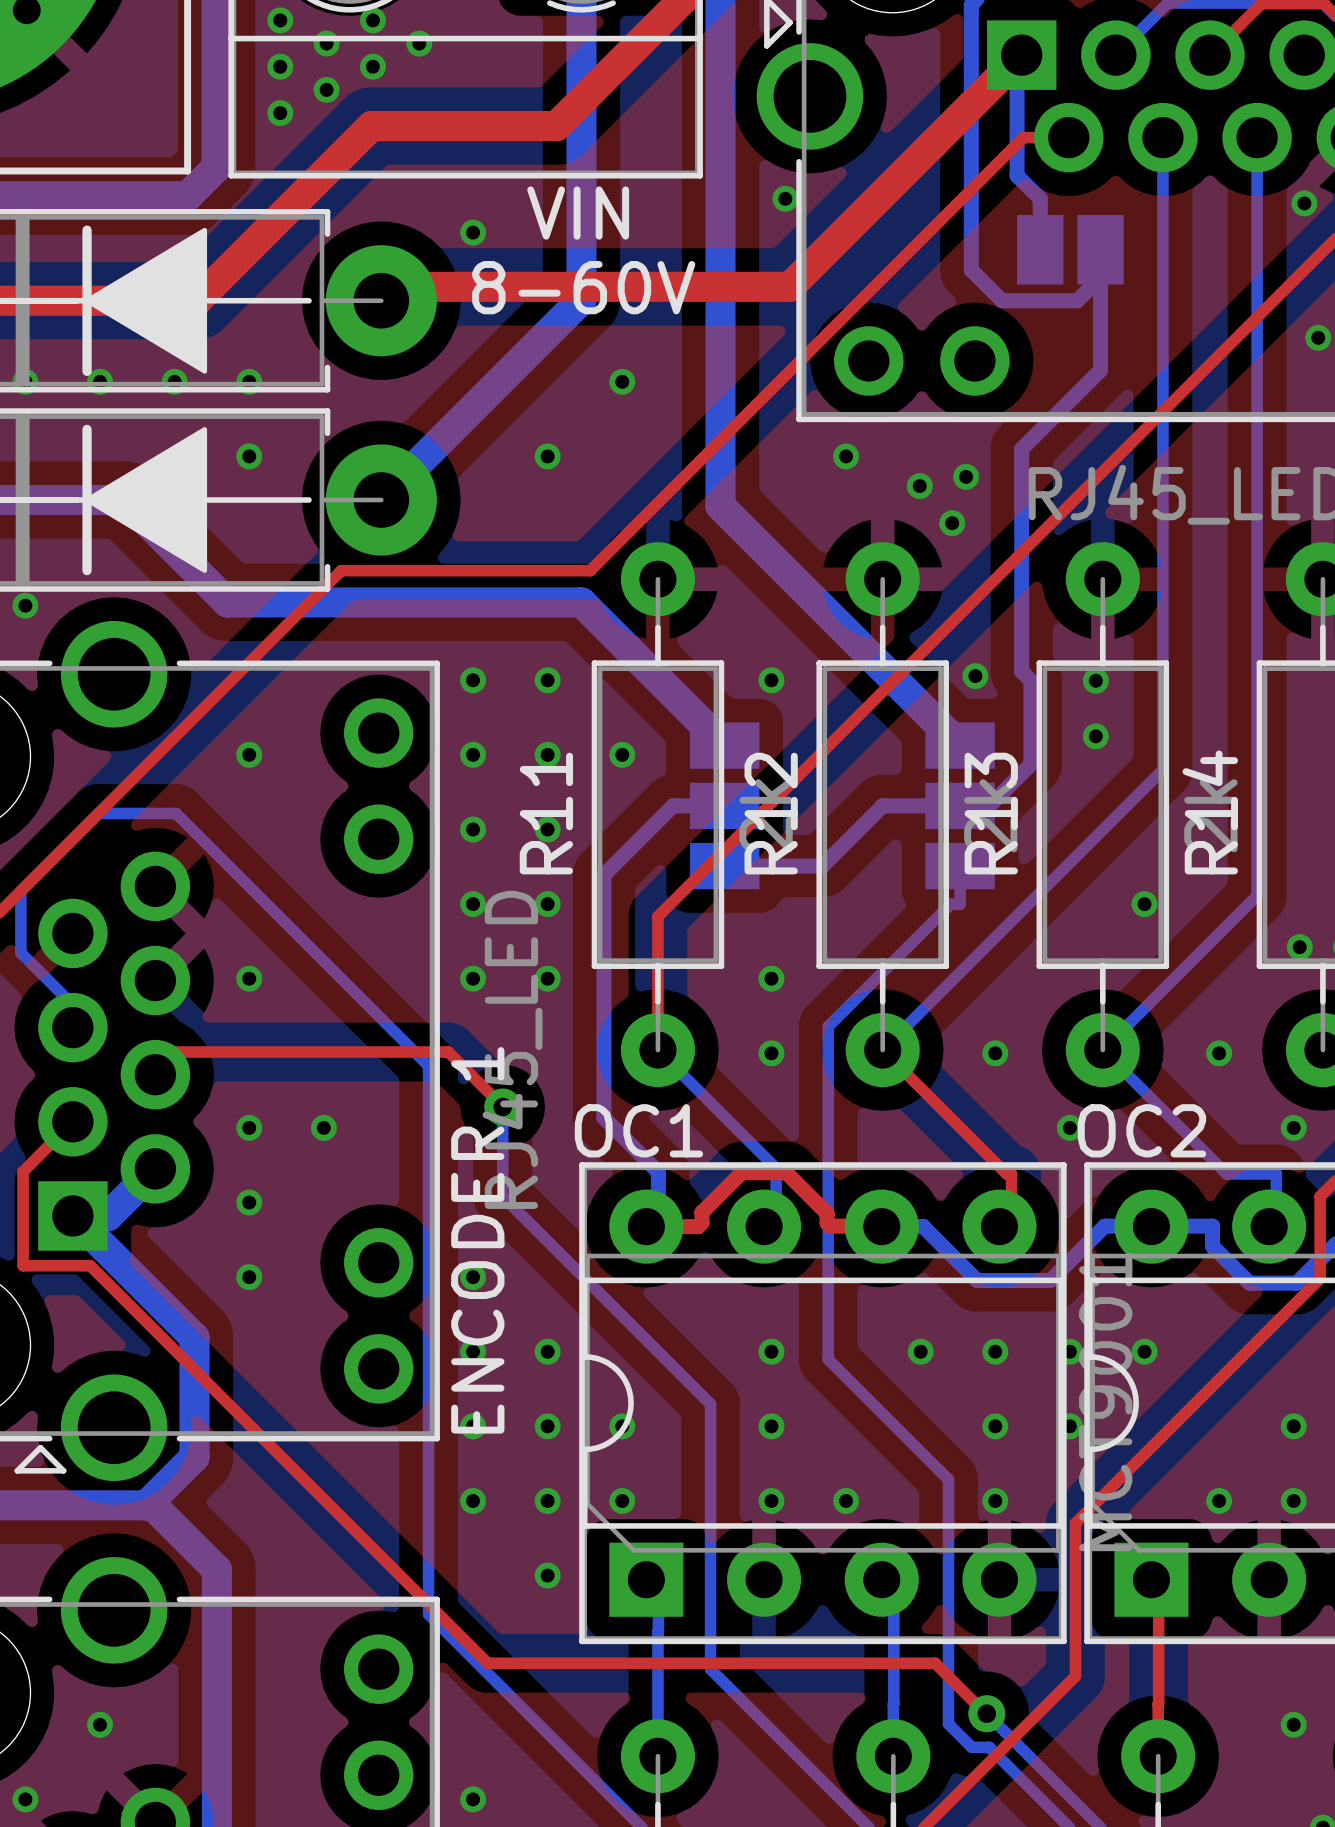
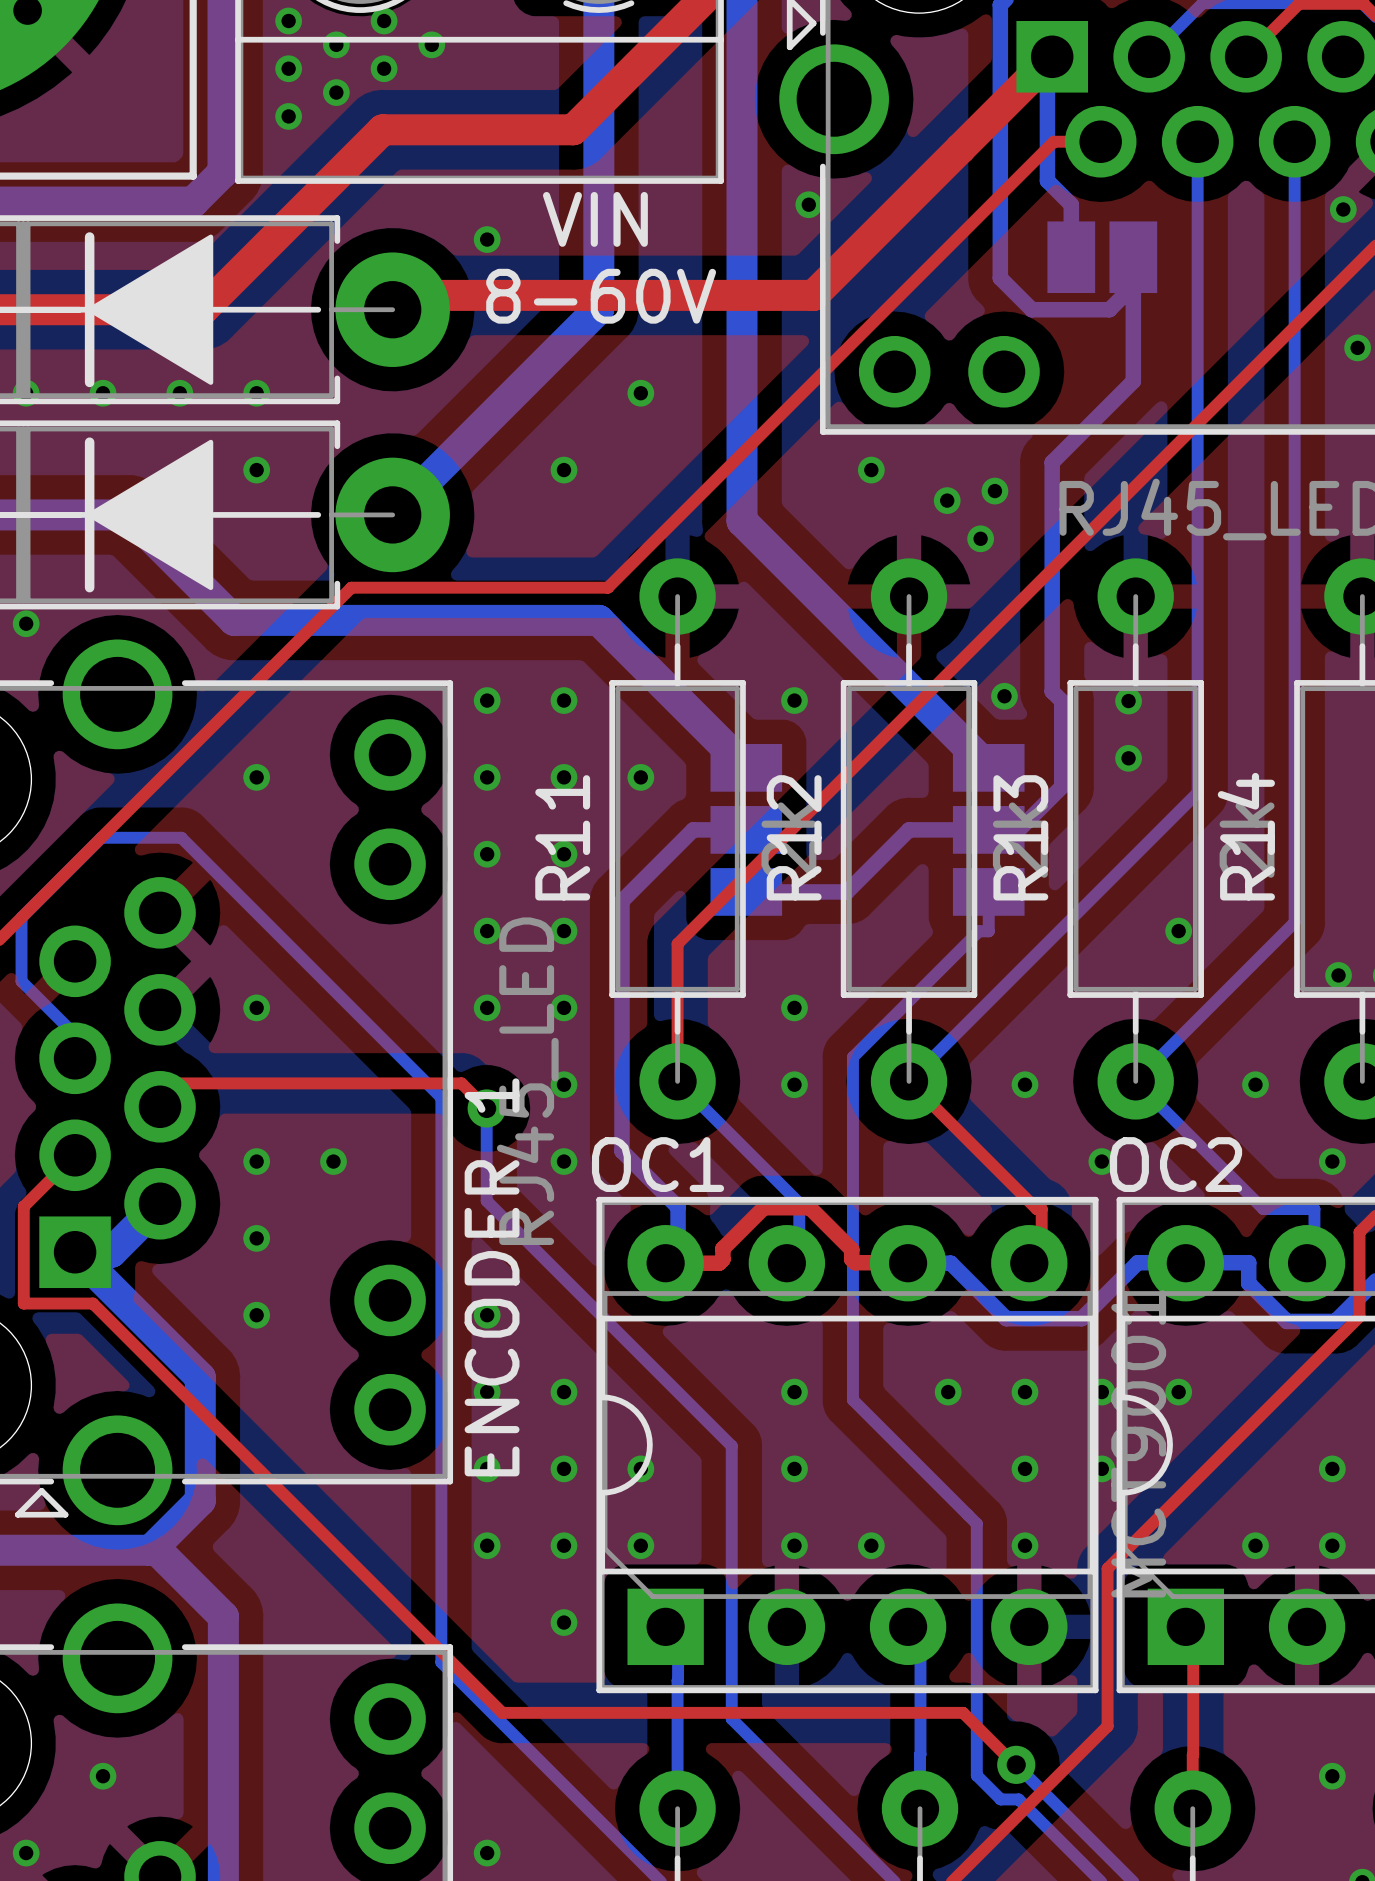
via: none -> (564, 1084)
top track: (472, 1076) (502, 1106) -> none
bottom track: (502, 1107) (502, 1196) -> (486, 1108) (486, 1200) (517, 1232)
via position: (502, 1107) -> (486, 1108)
via: none -> (564, 1161)

